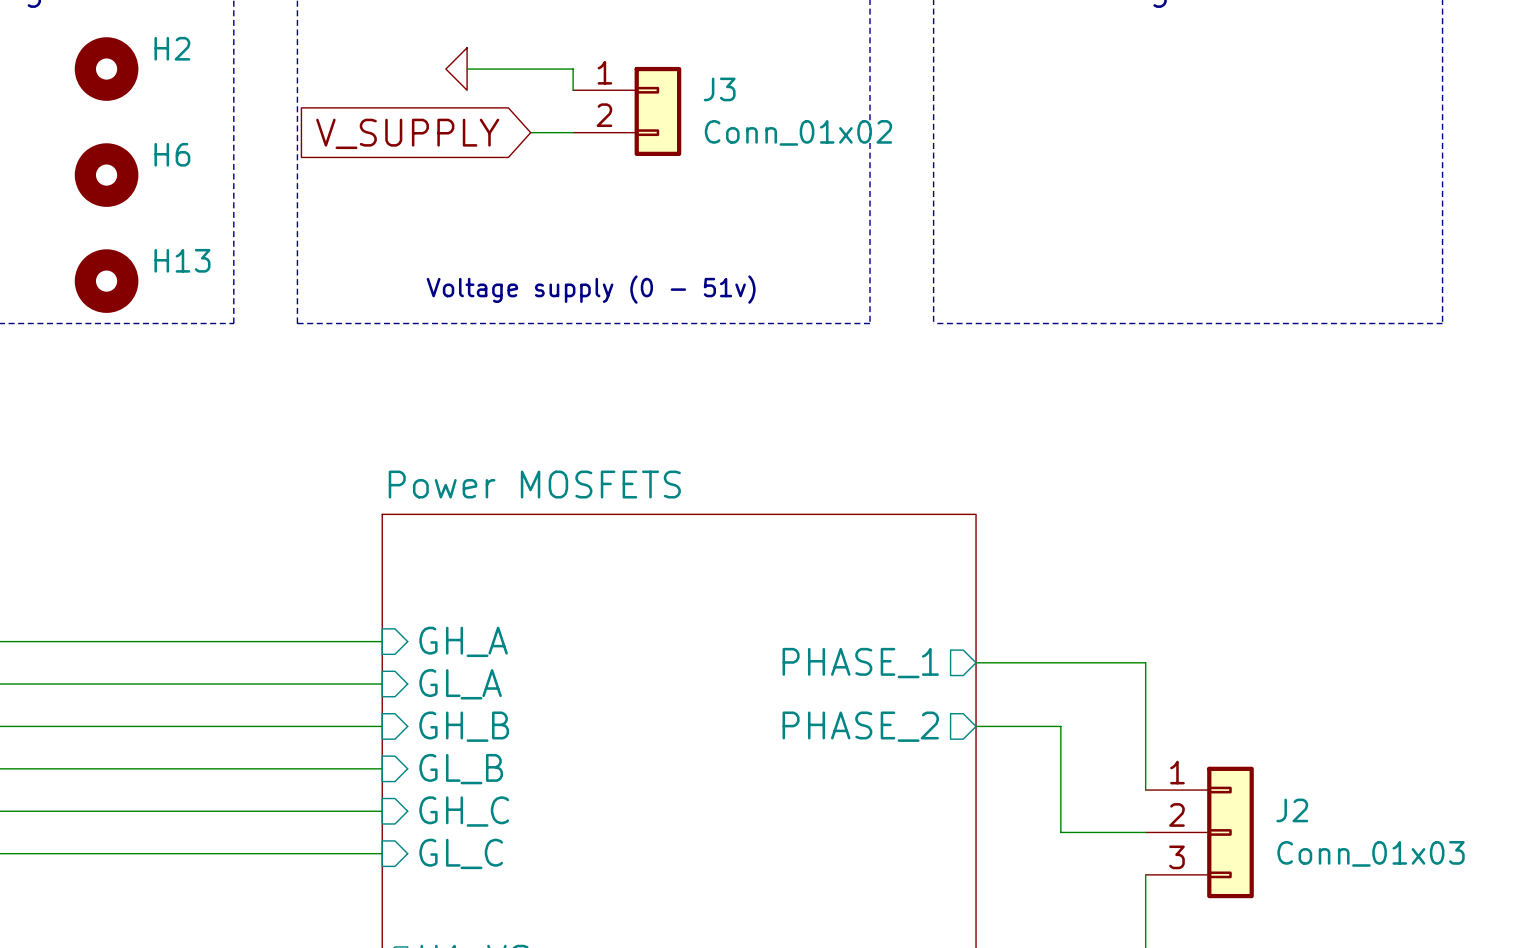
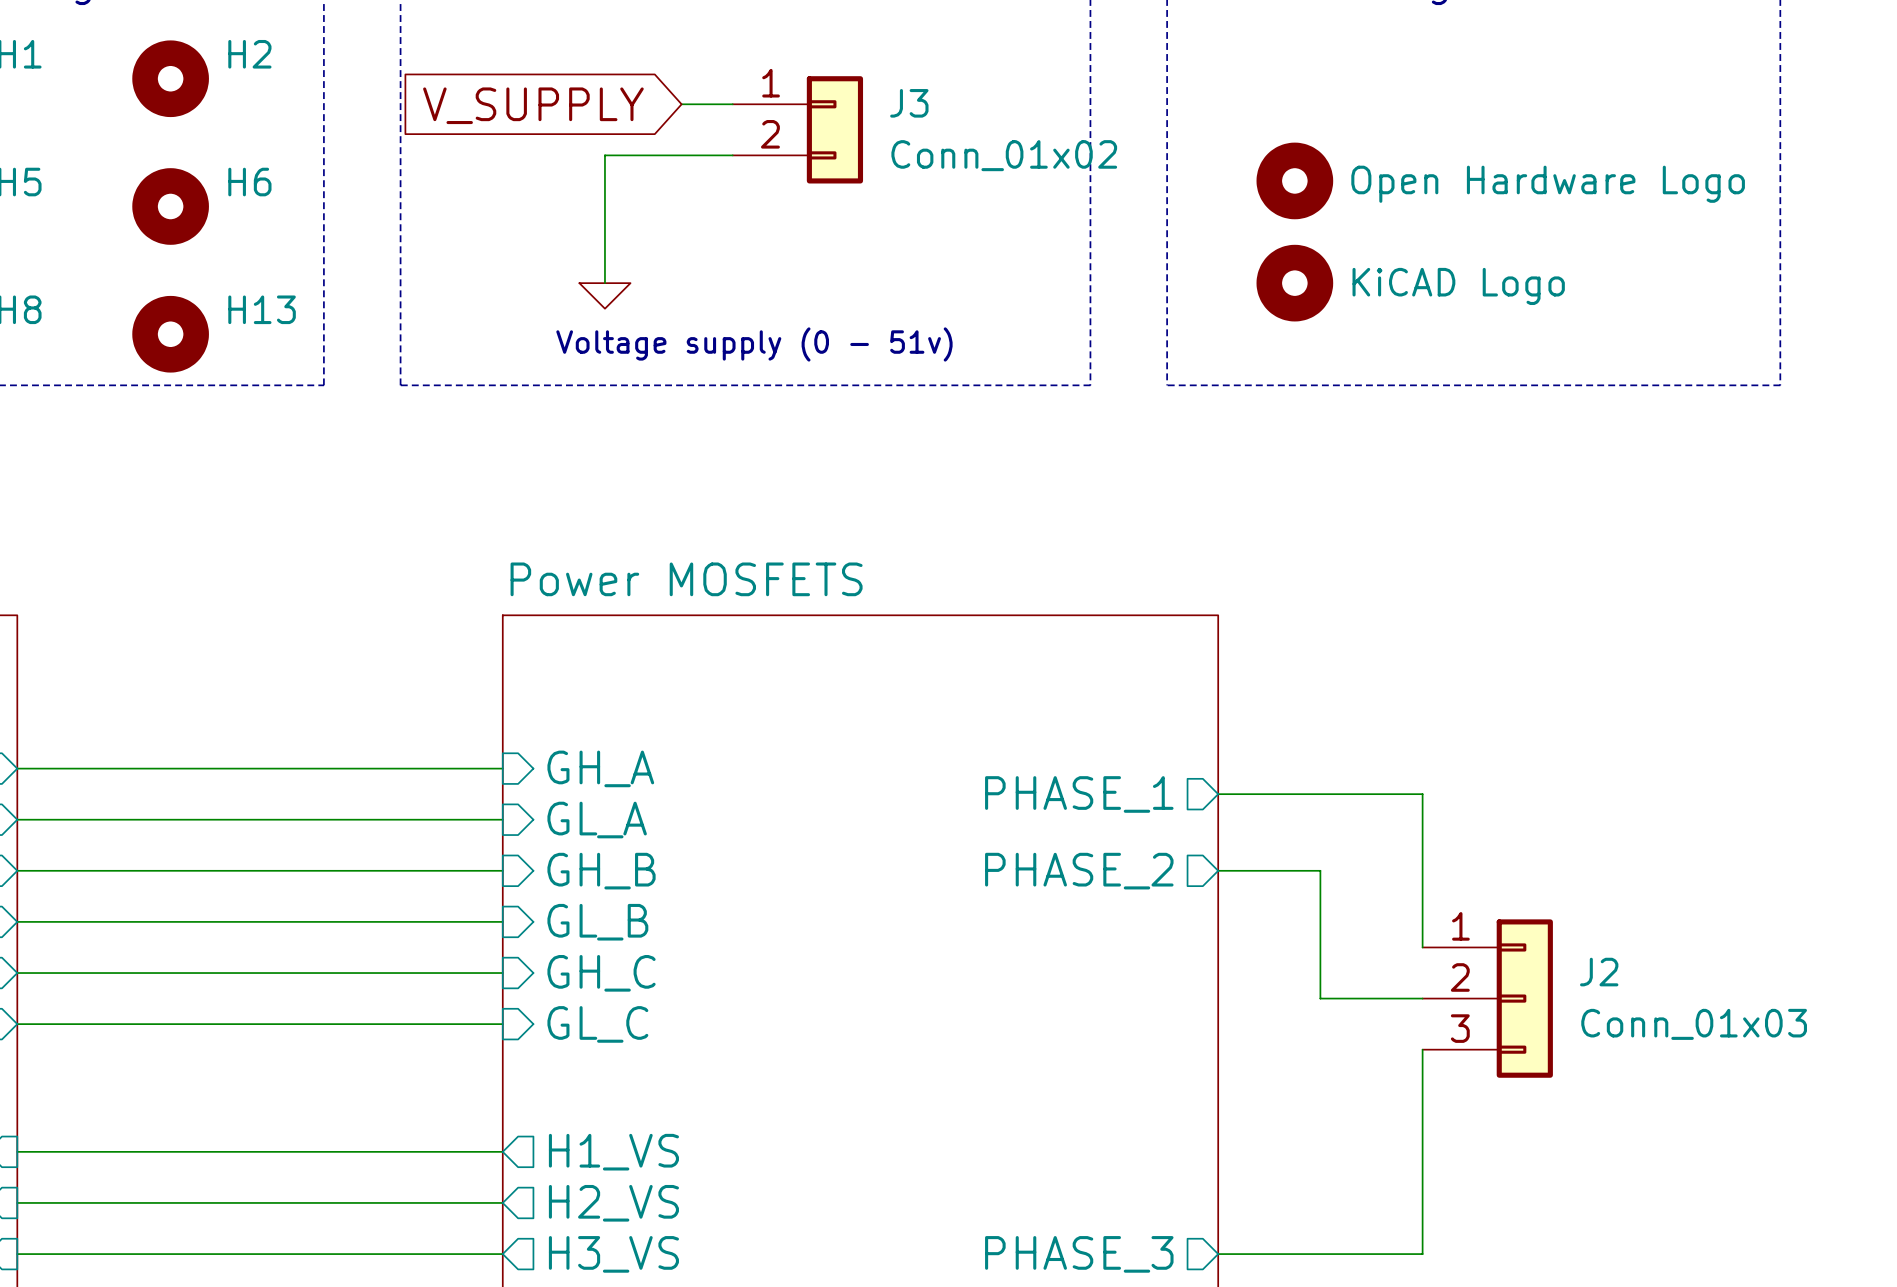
power symbol rotation: 0° (456, 69) -> 90° counterclockwise (604, 295)
power symbol position: (456, 69) -> (604, 295)
wire: (467, 69) (573, 69) (573, 90) -> (681, 104) (732, 104)
wire: none -> (681, 155) (604, 155) (604, 283)
global label position: V_SUPPLY (407, 133) -> V_SUPPLY (533, 105)
part: none -> Open Hardware Logo (1294, 180)
part: none -> KiCAD Logo (1294, 283)

